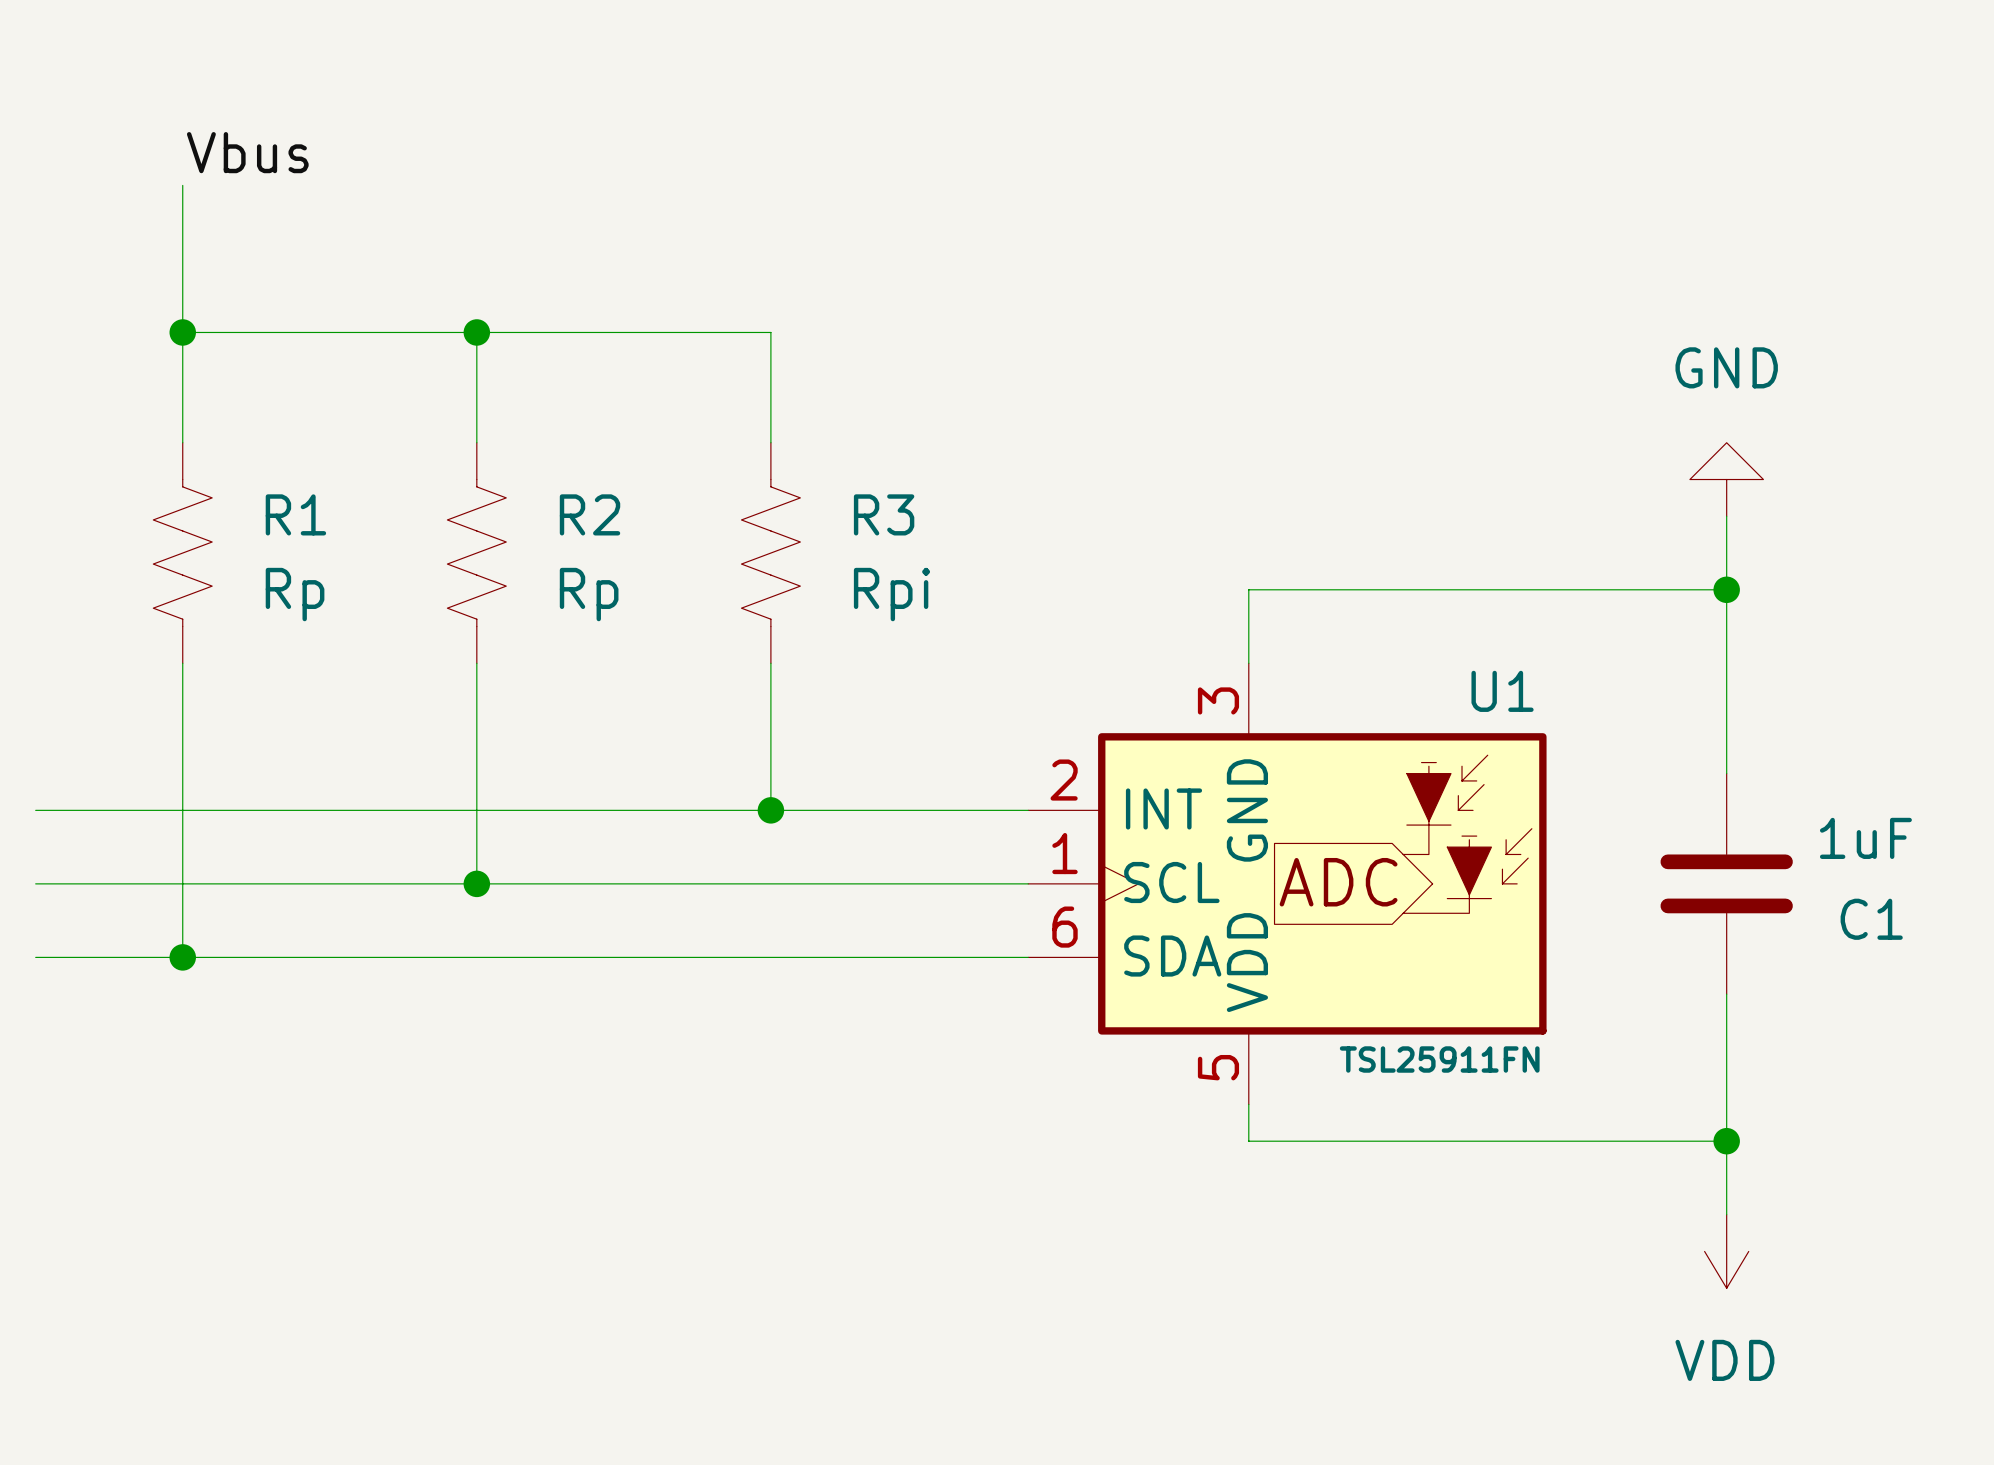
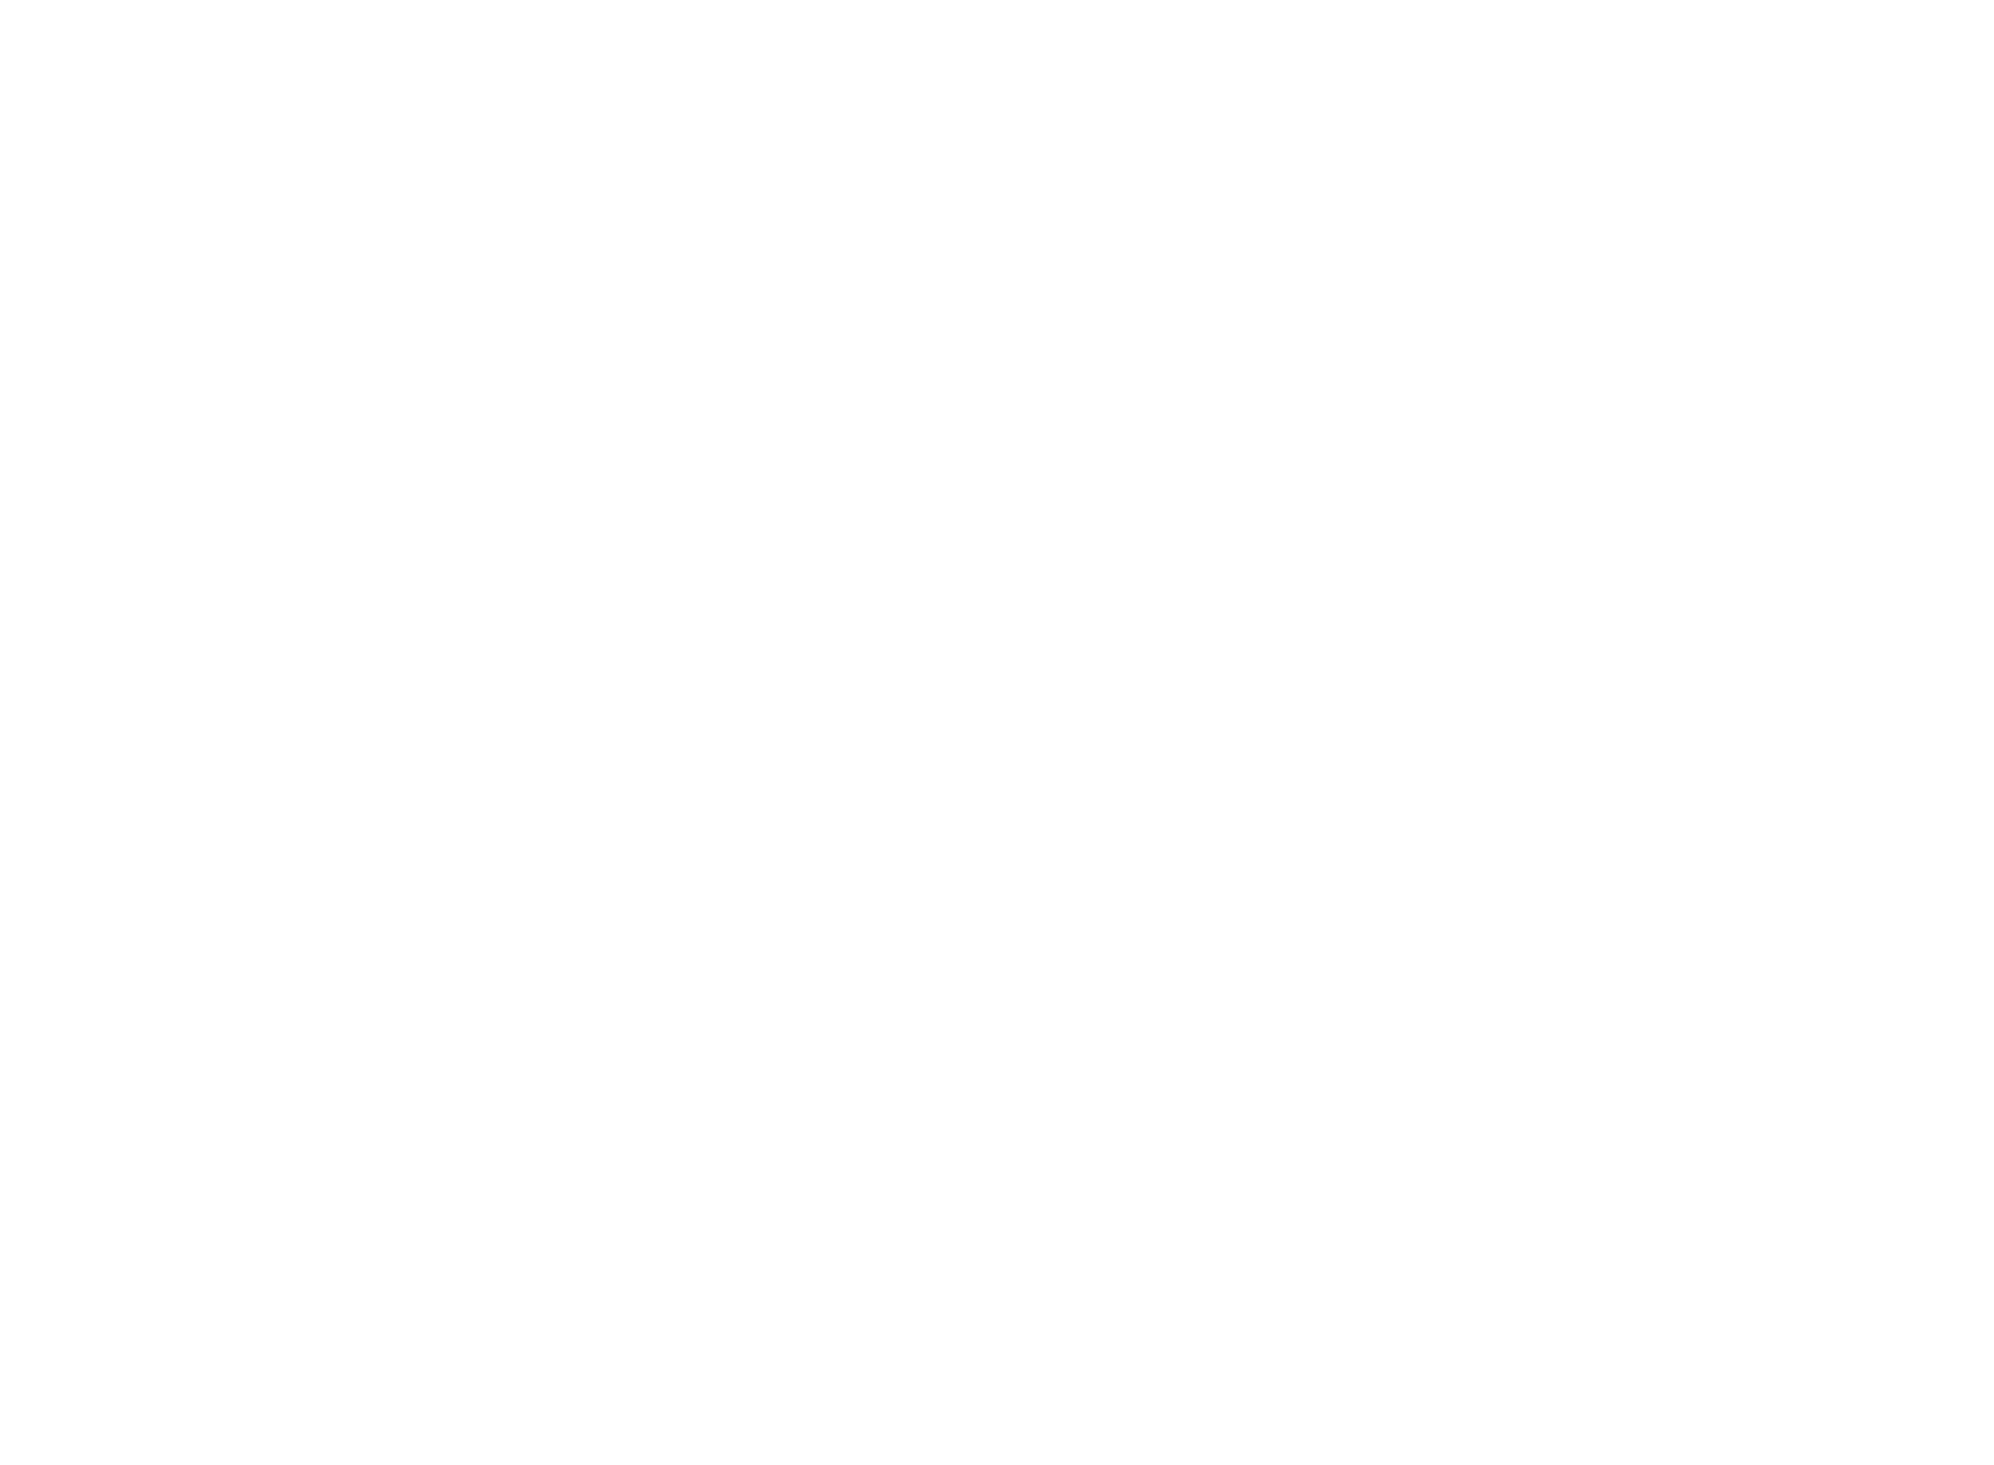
label: Vbus (247, 152) -> none
wire: (182, 185) (182, 442) -> none
wire: (182, 332) (770, 332) (770, 442) -> none
junction: (182, 332) -> none
wire: (476, 332) (476, 442) -> none
junction: (476, 332) -> none
power symbol: GND (1726, 479) -> none
wire: (1726, 516) (1726, 773) -> none
R1: Rp (182, 553) -> none
R2: Rp (476, 553) -> none
R3: Rpi (770, 553) -> none
wire: (1726, 589) (1248, 589) (1248, 663) -> none
junction: (1726, 589) -> none
wire: (182, 663) (182, 957) -> none
wire: (476, 663) (476, 883) -> none
wire: (770, 663) (770, 810) -> none
wire: (35, 810) (1028, 810) -> none
junction: (770, 810) -> none
wire: (35, 883) (1028, 883) -> none
junction: (476, 883) -> none
U1: TSL25911FN (1287, 883) -> none
C1: 1uF (1726, 883) -> none
wire: (35, 957) (1028, 957) -> none
junction: (182, 957) -> none
wire: (1726, 994) (1726, 1214) -> none
wire: (1248, 1104) (1248, 1141) (1726, 1141) -> none
junction: (1726, 1141) -> none
power symbol: VDD (1726, 1251) -> none

